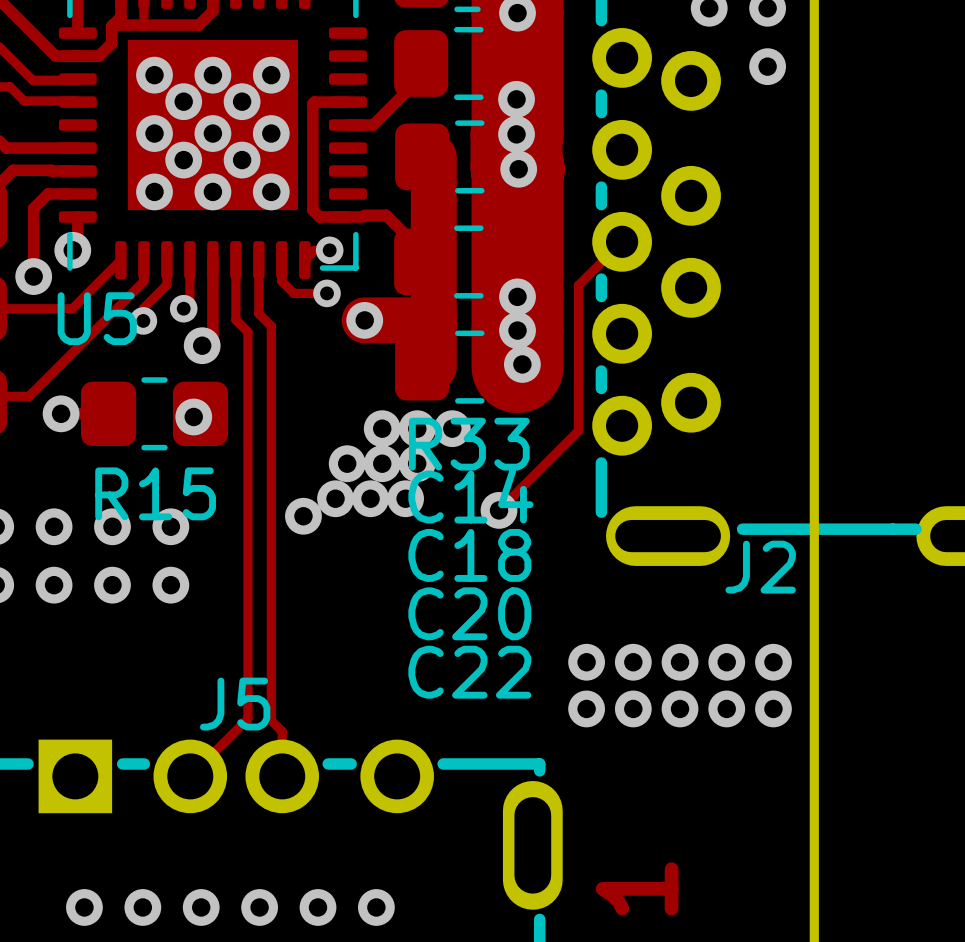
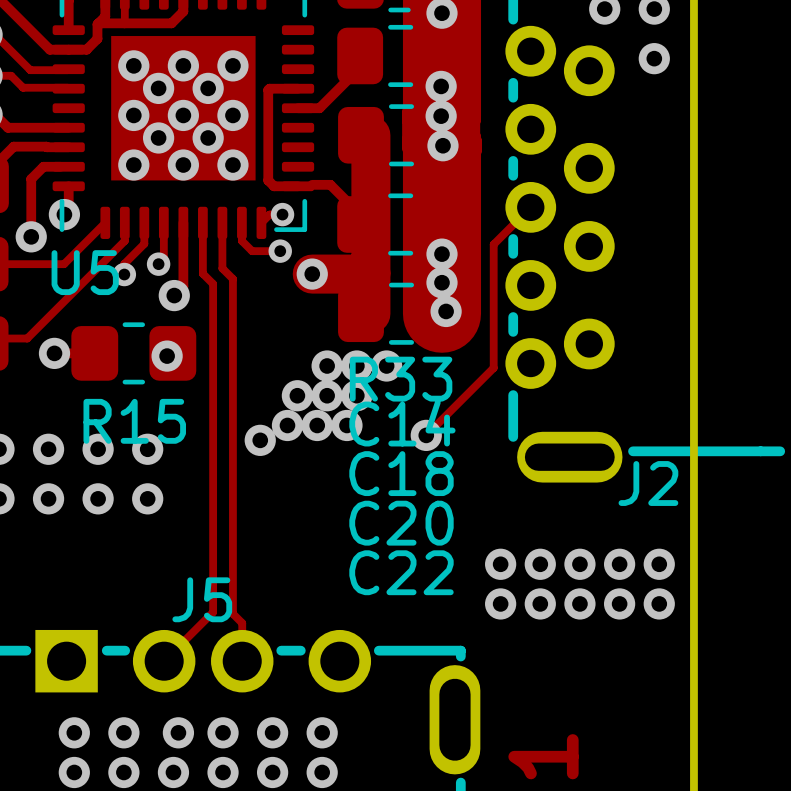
via: none -> (74, 732)
via: none -> (123, 732)
via: none -> (178, 732)
via: none -> (223, 732)
via: none -> (272, 732)
via: none -> (322, 732)

